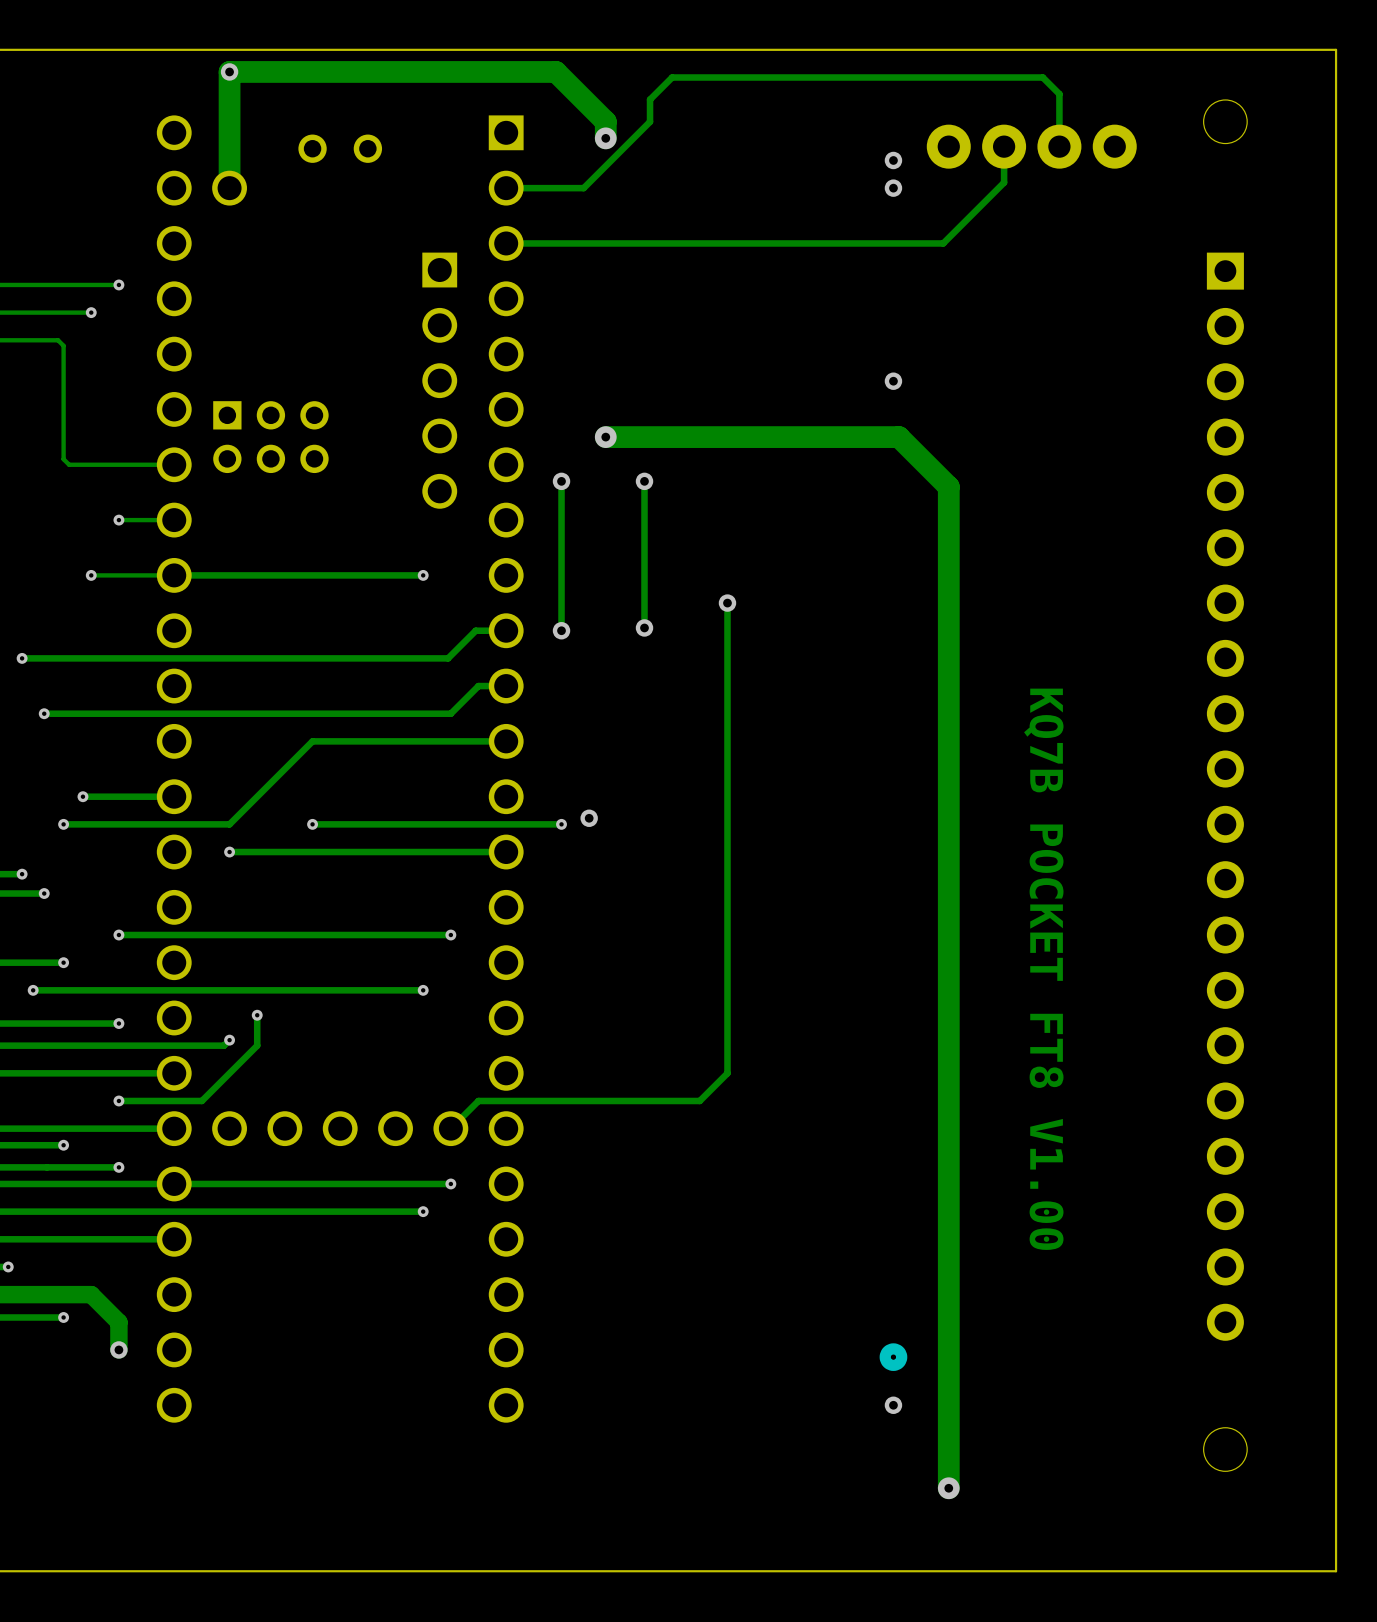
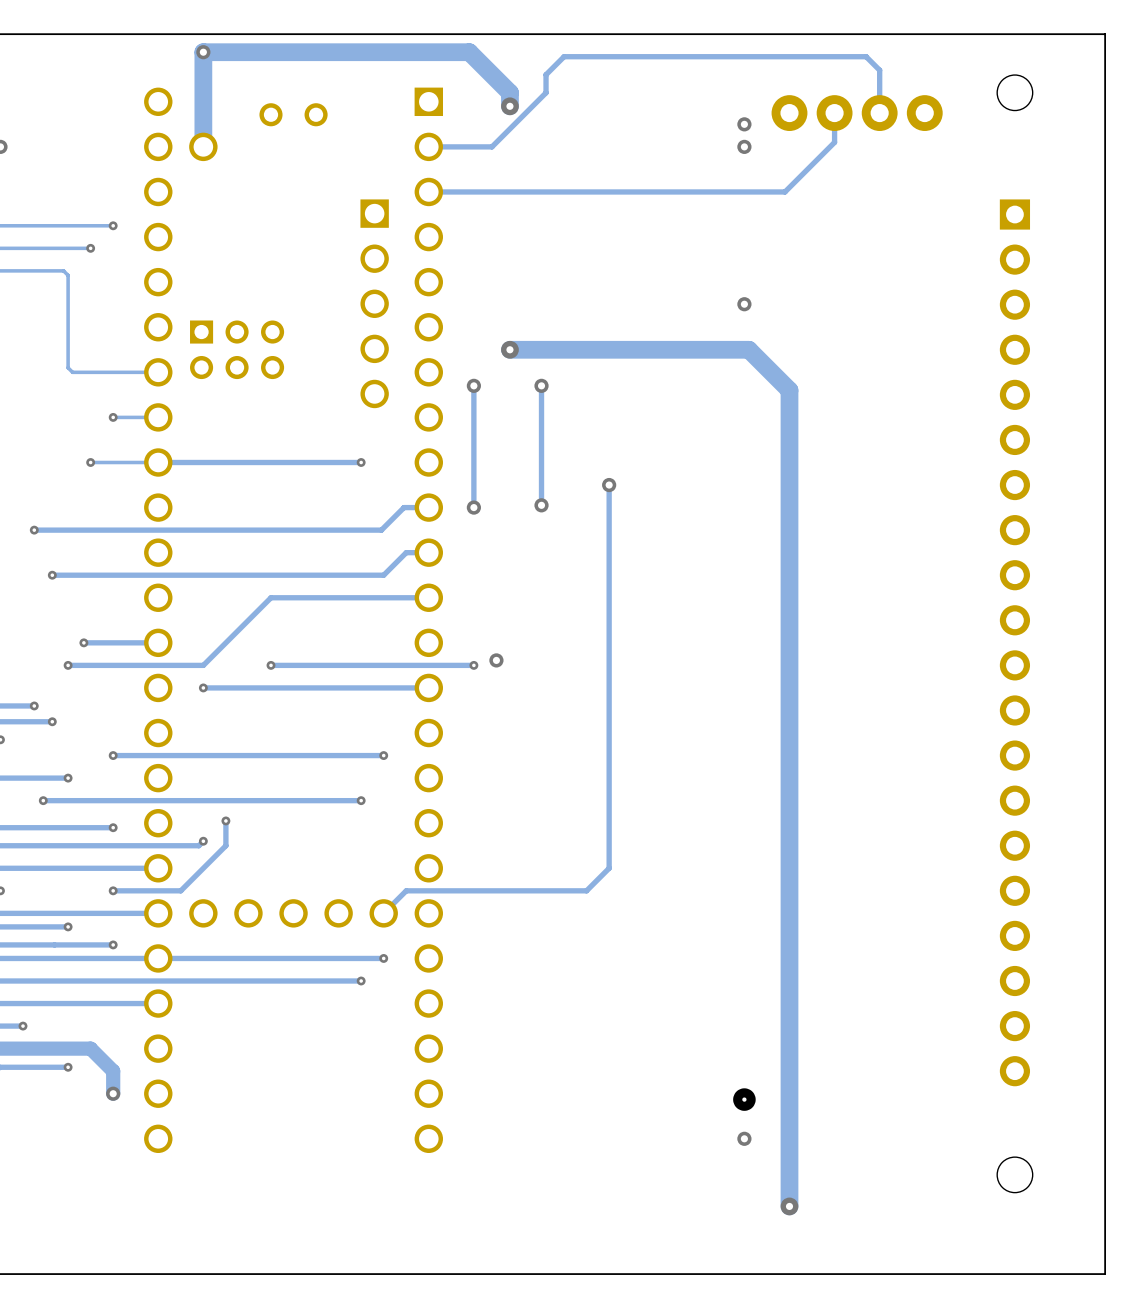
text: KQ7B POCKET FT8 V1.00 (1043, 969) -> none

